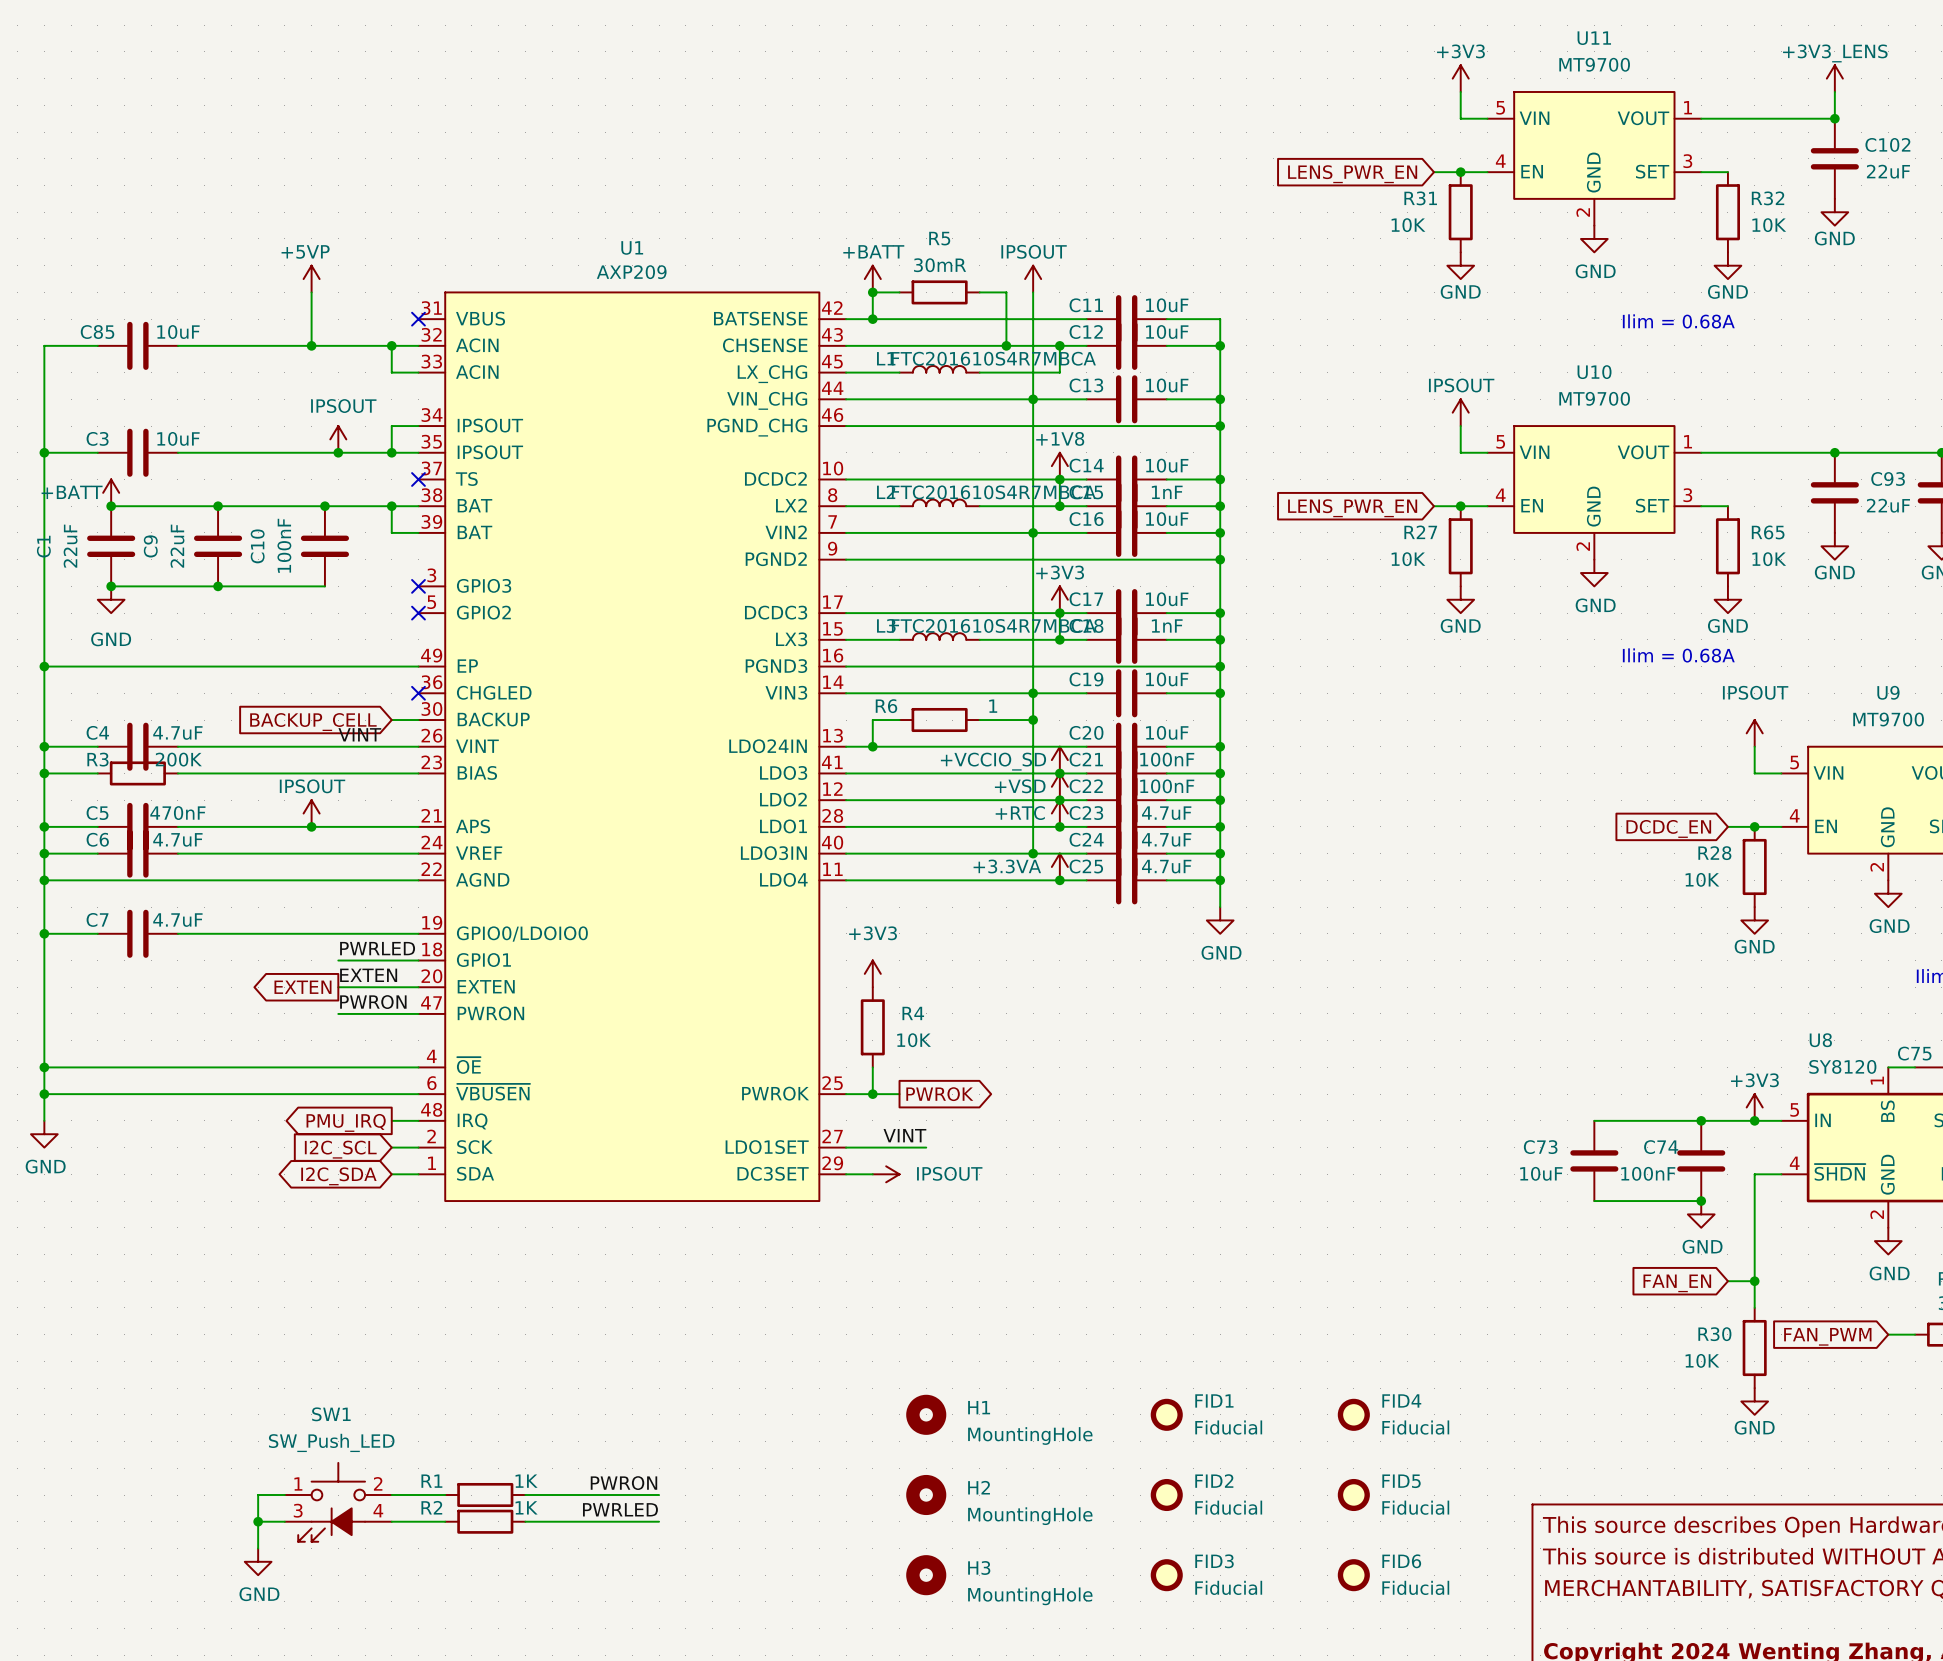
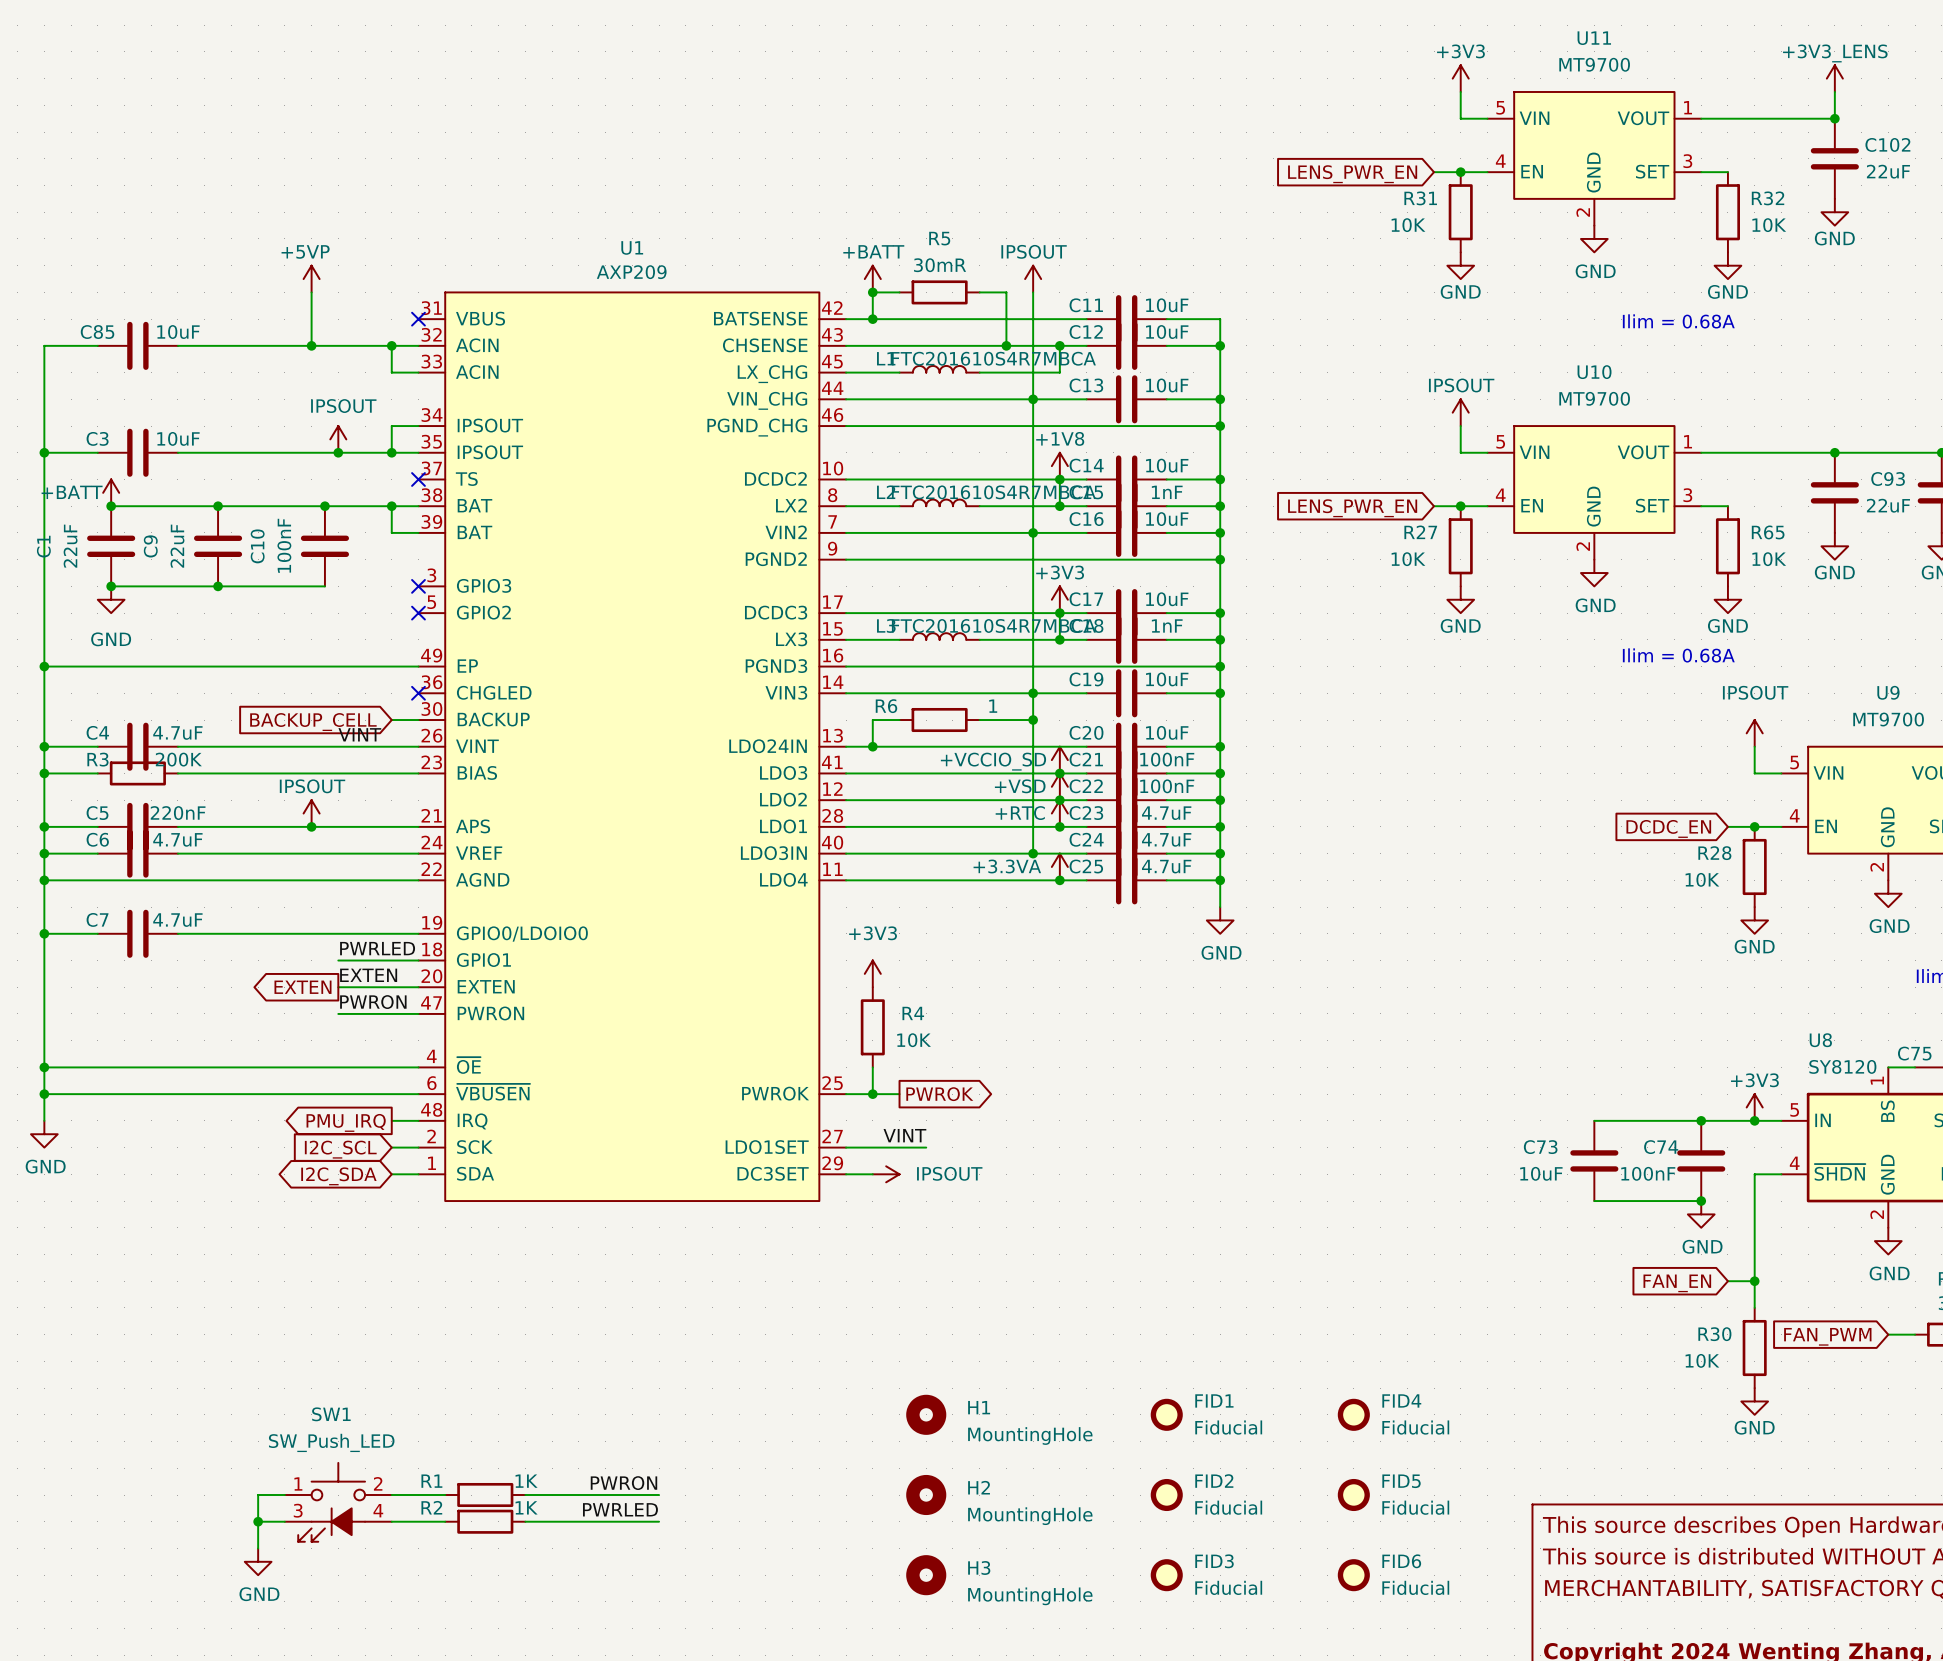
C5 value: 470nF (177, 813) -> 220nF (178, 813)

